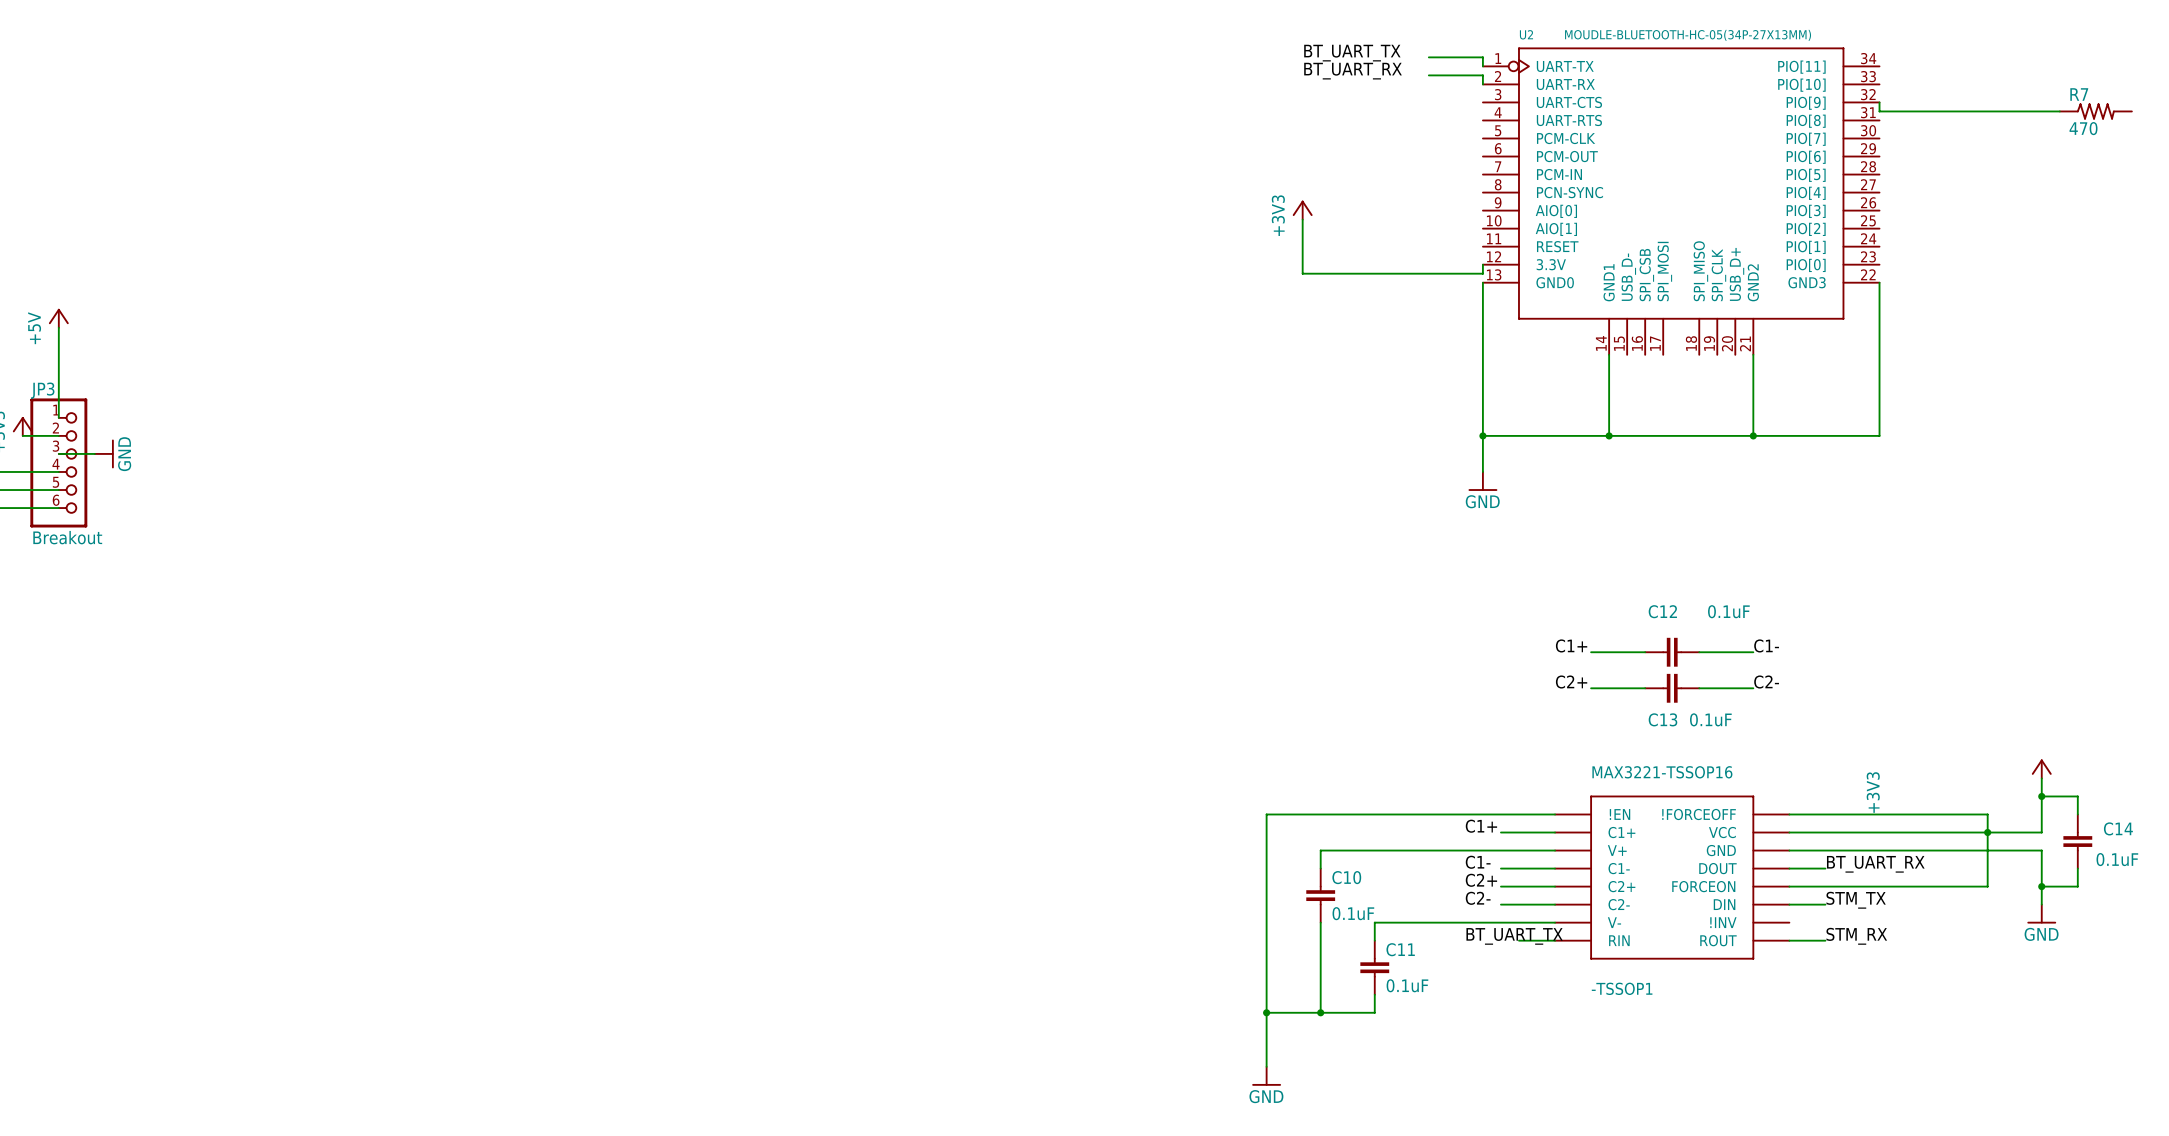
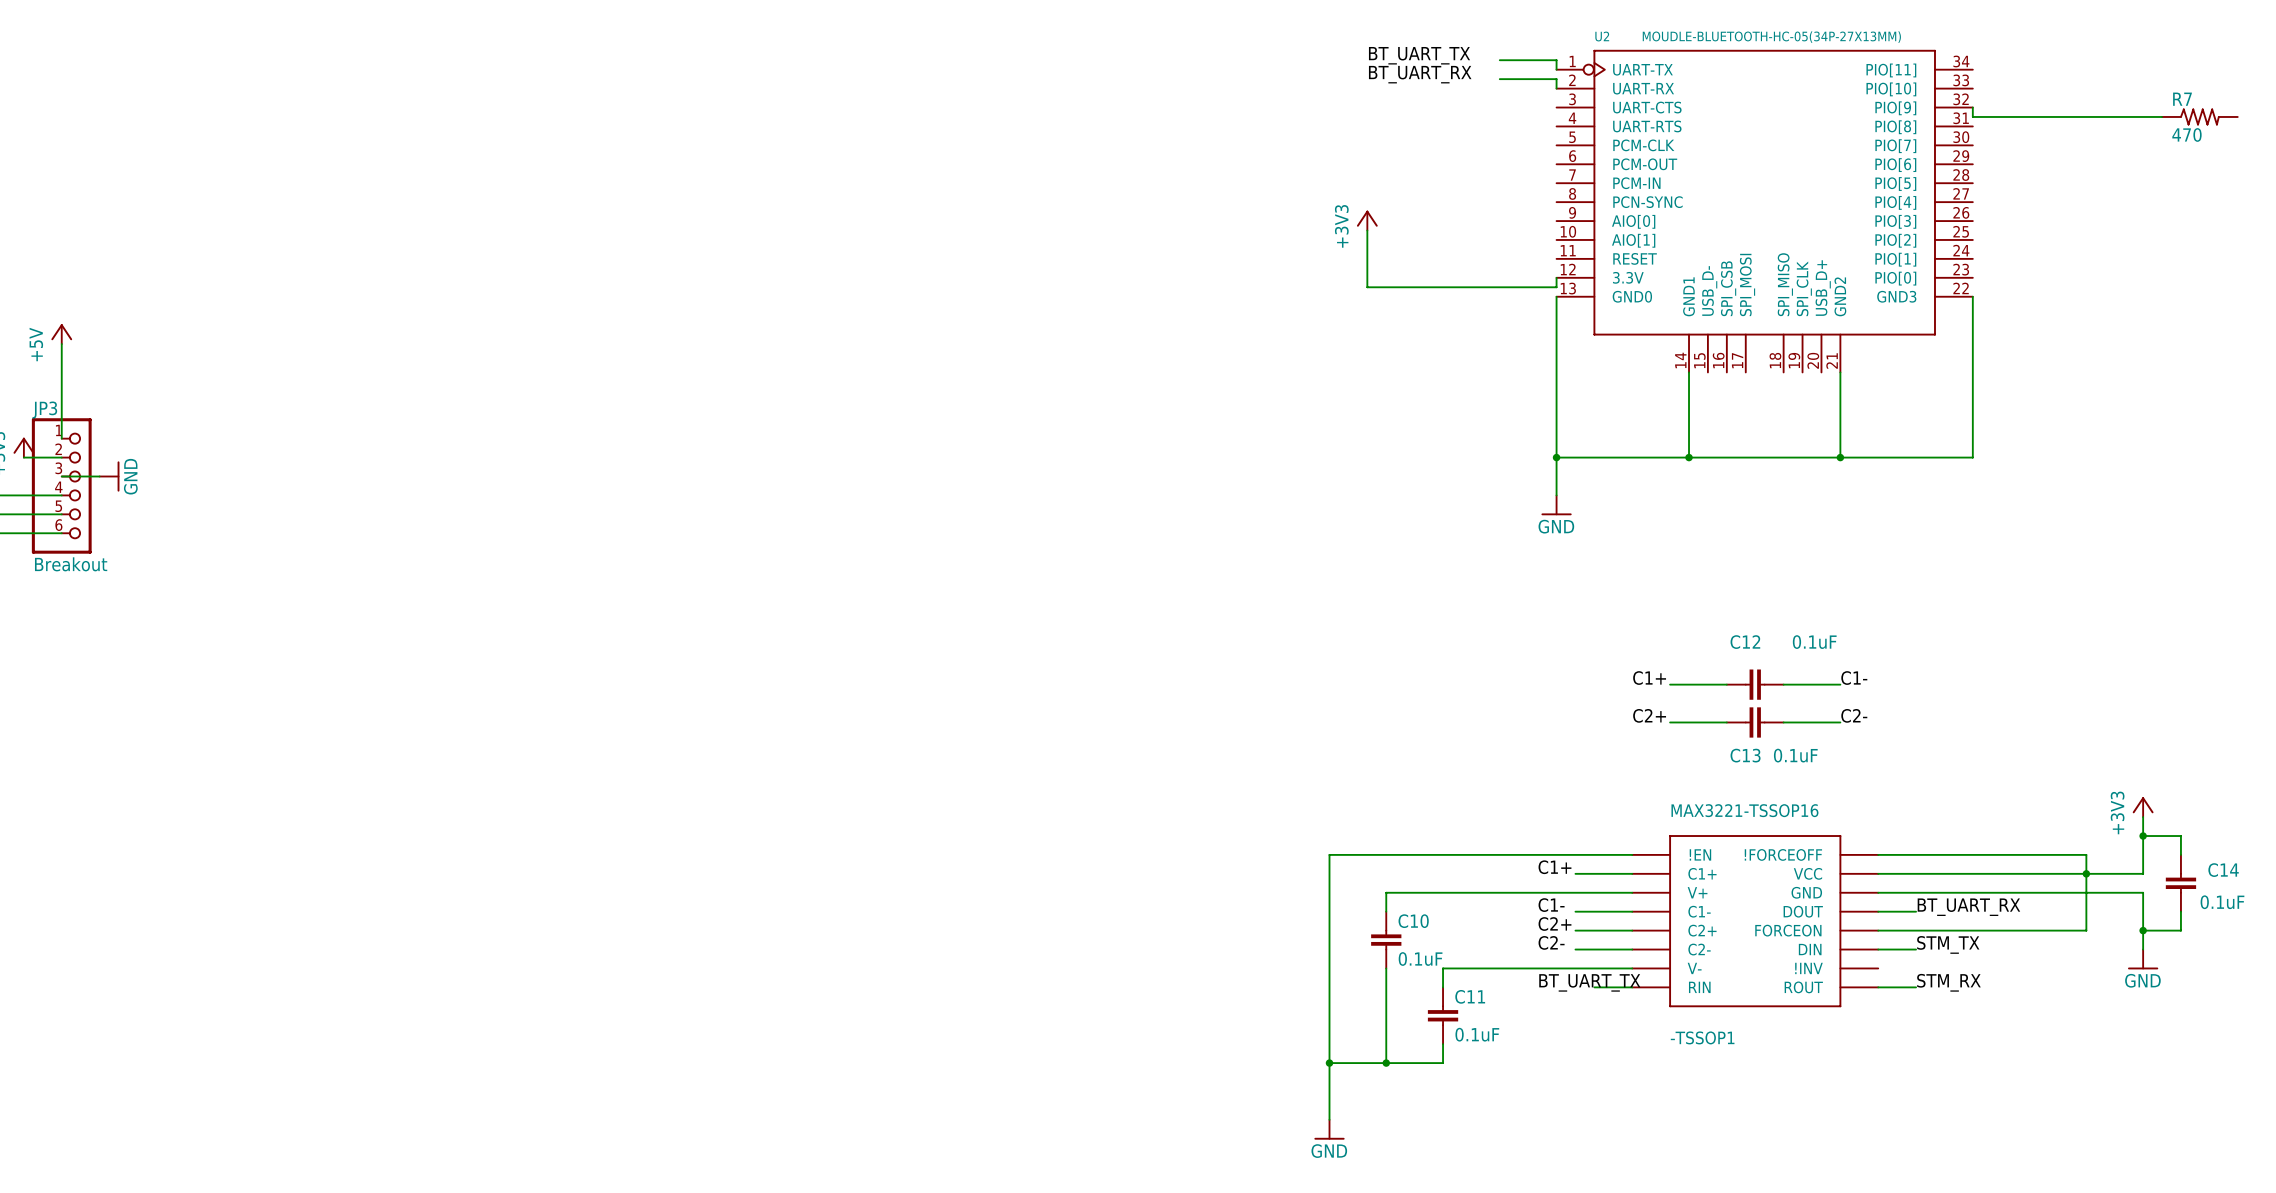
power symbol text position: +3V3 (1873, 792) -> +3V3 (2117, 812)

